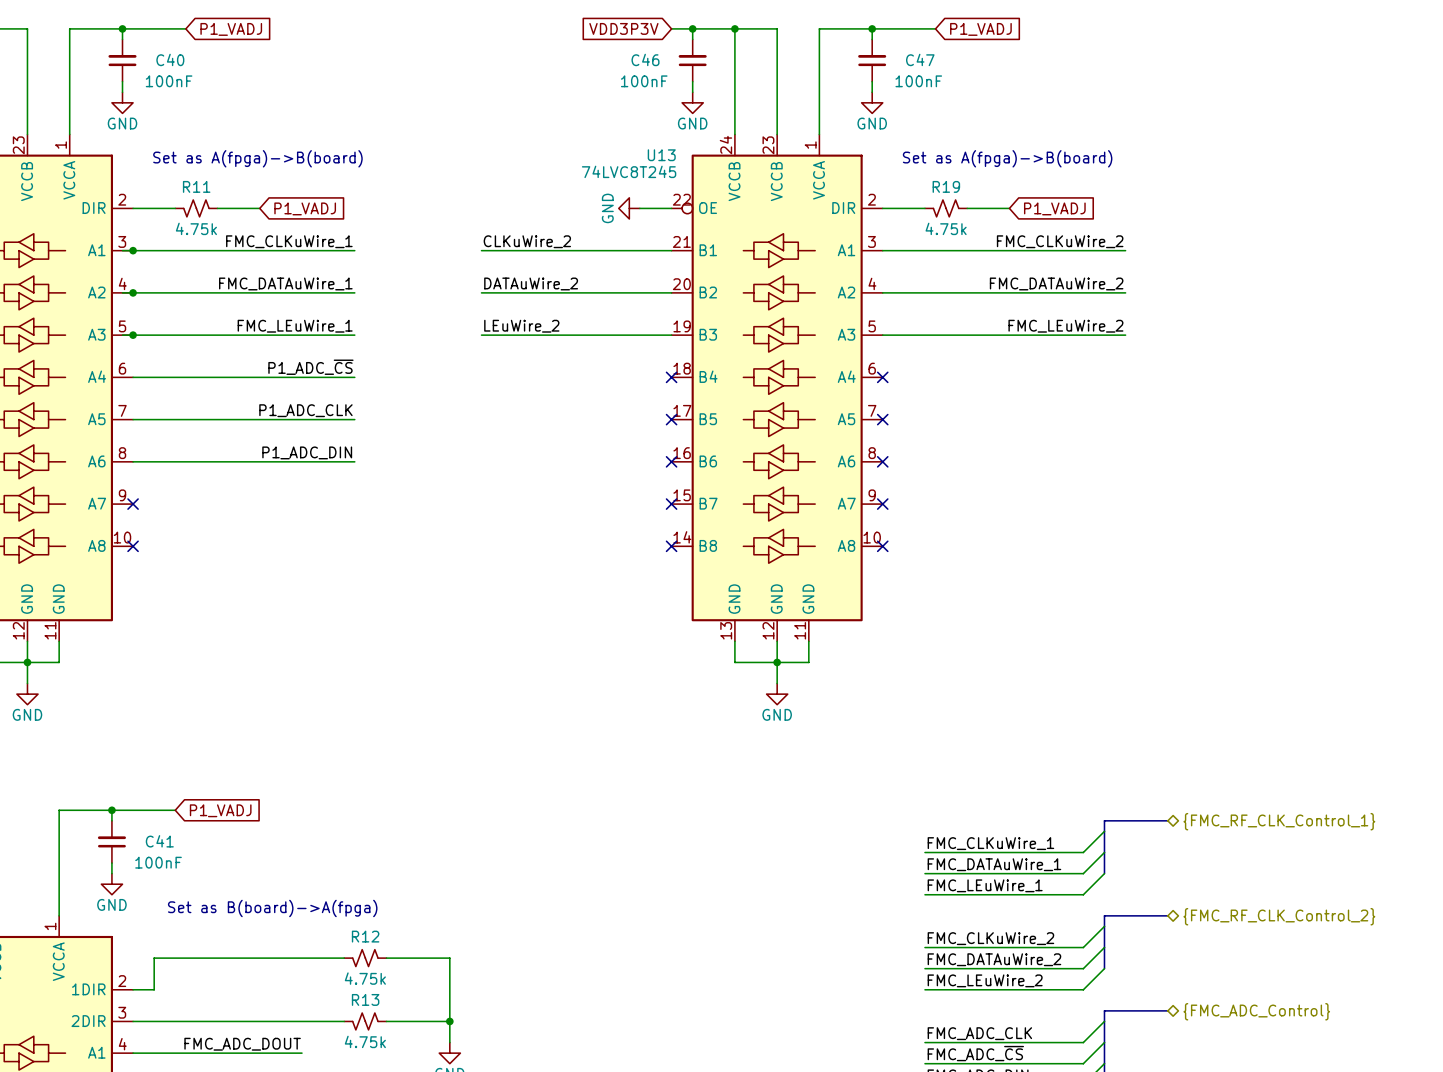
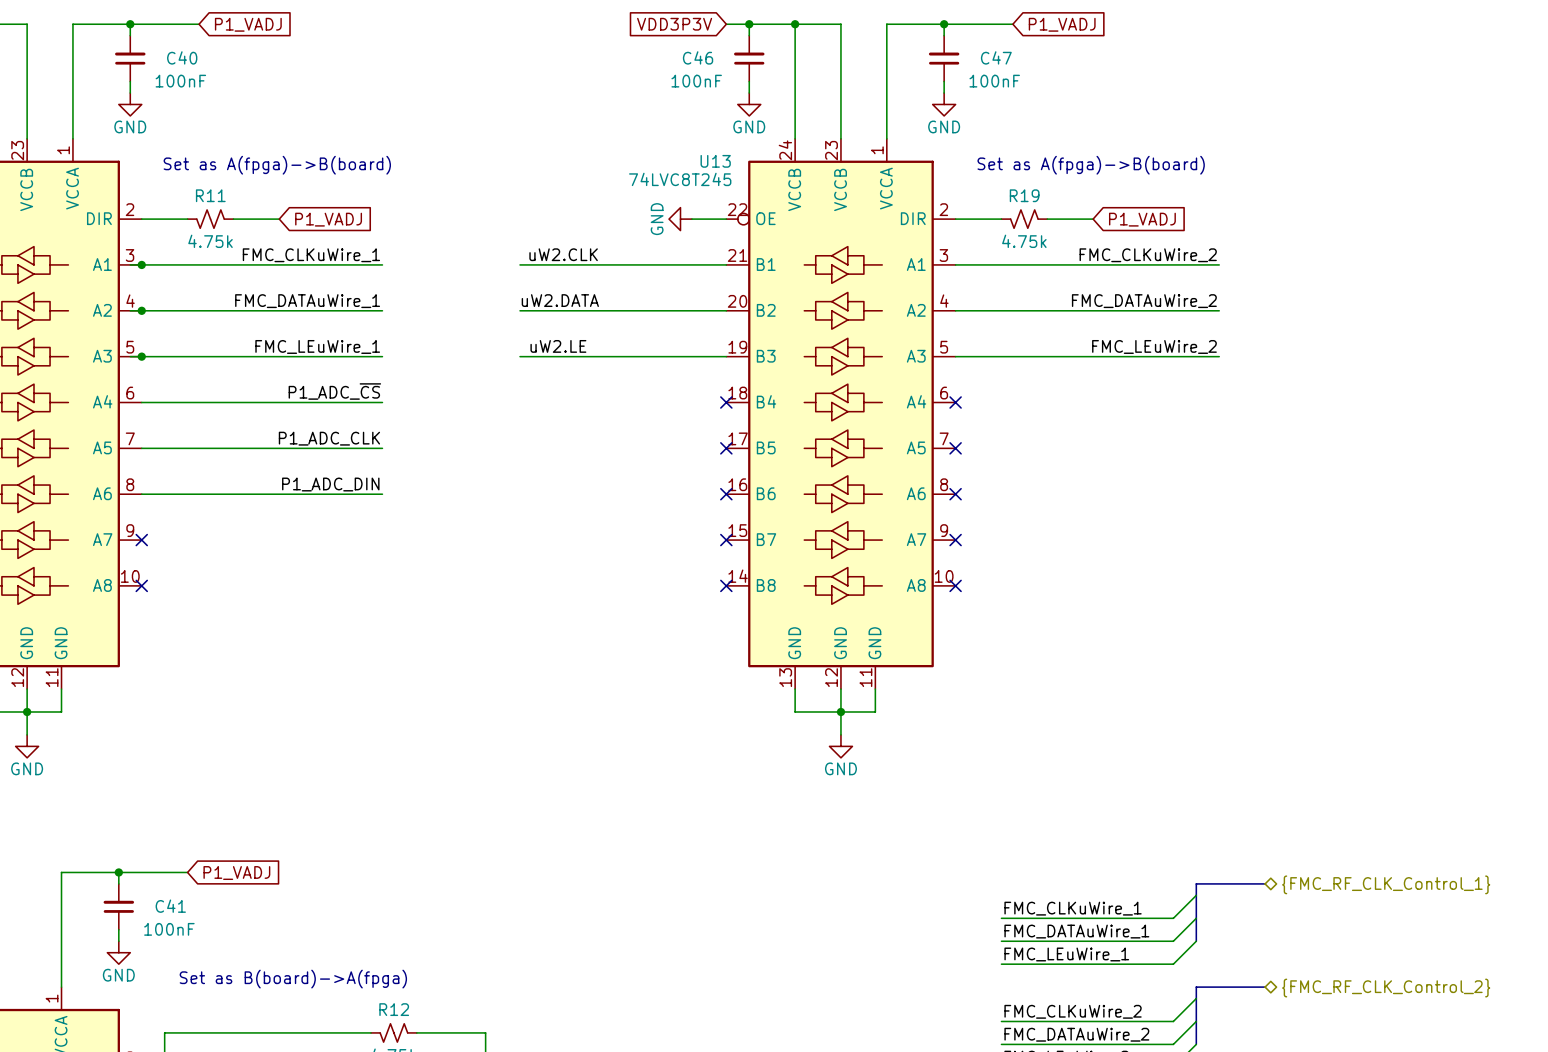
label: none -> uW2.CLK (563, 254)
label: CLKuWire_2 (527, 241) -> none
label: none -> uW2.DATA (560, 300)
label: DATAuWire_2 (531, 283) -> none
label: none -> uW2.LE (558, 346)
label: LEuWire_2 (521, 326) -> none

